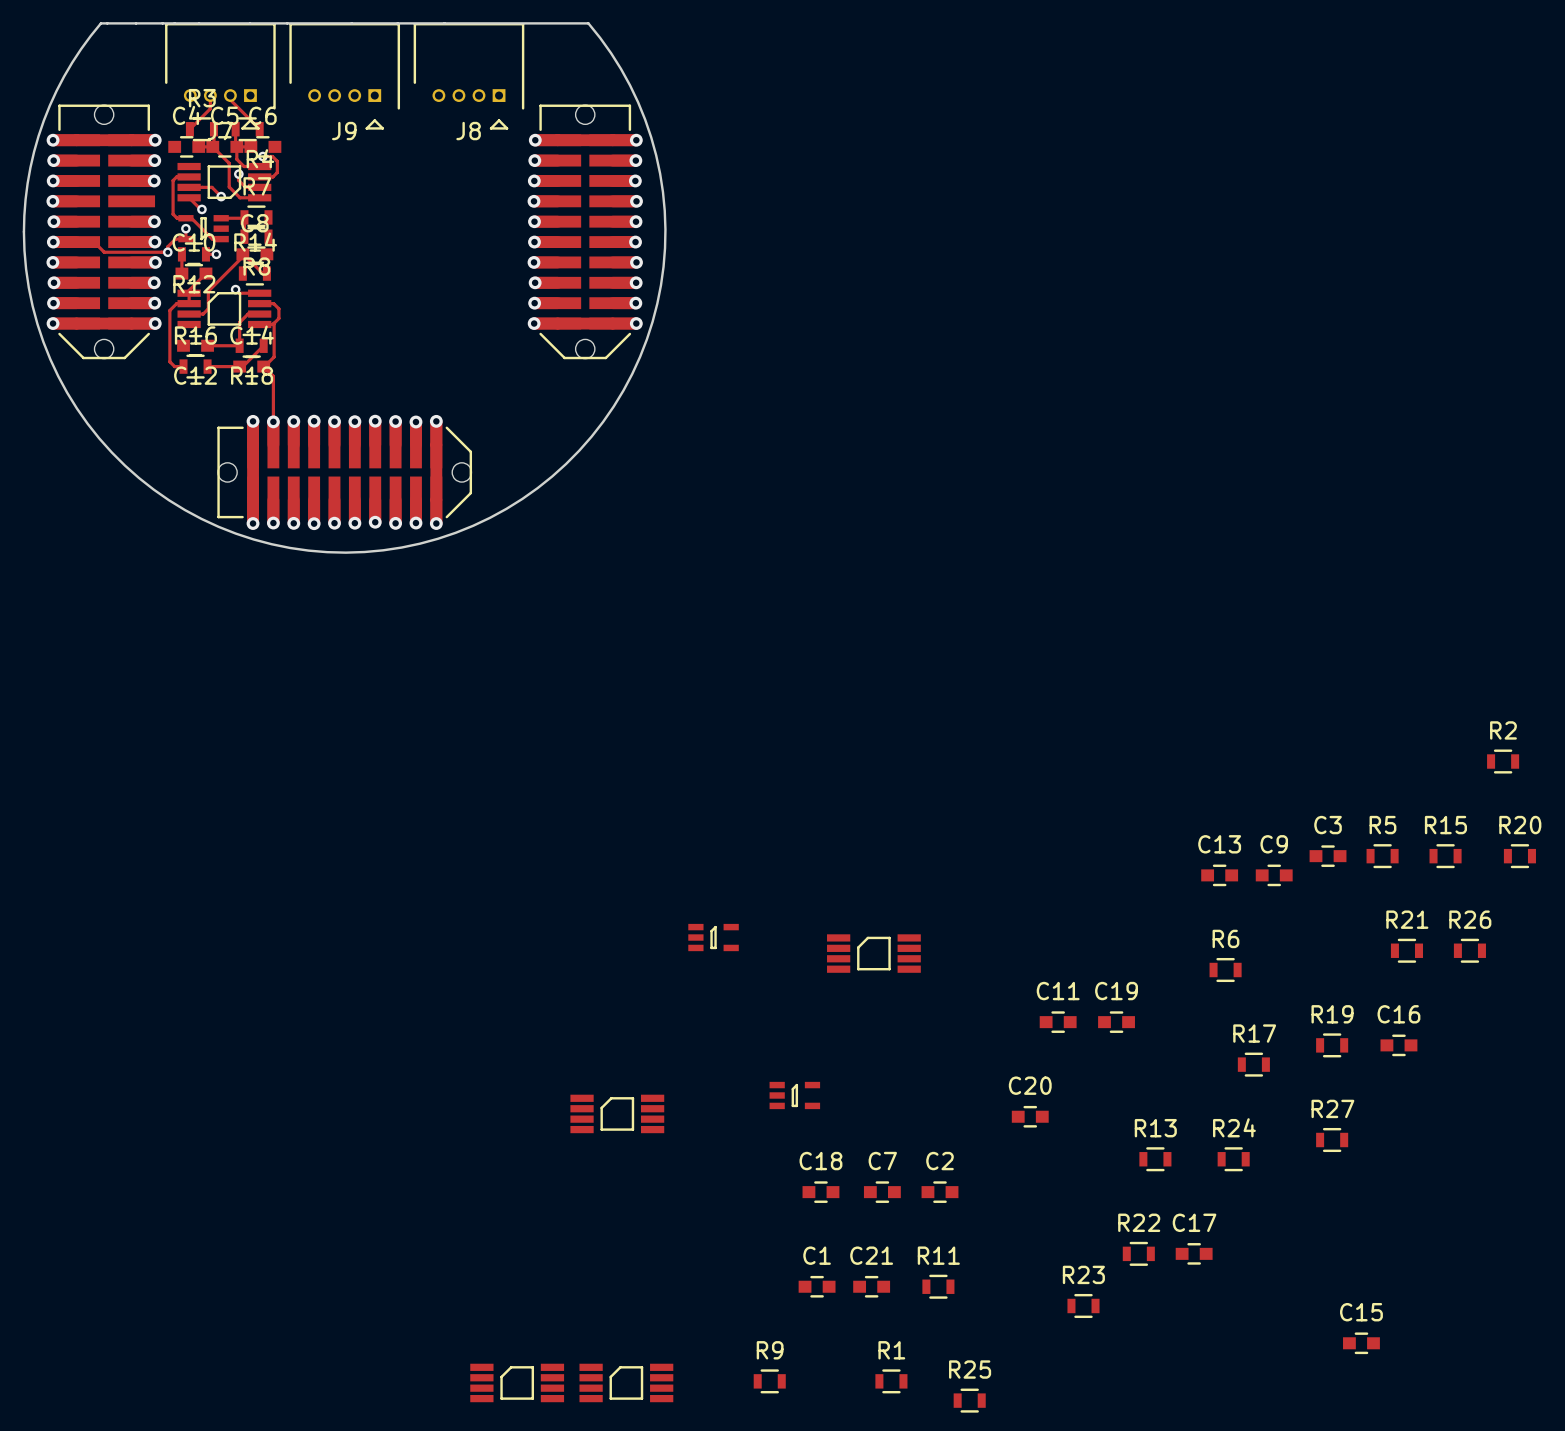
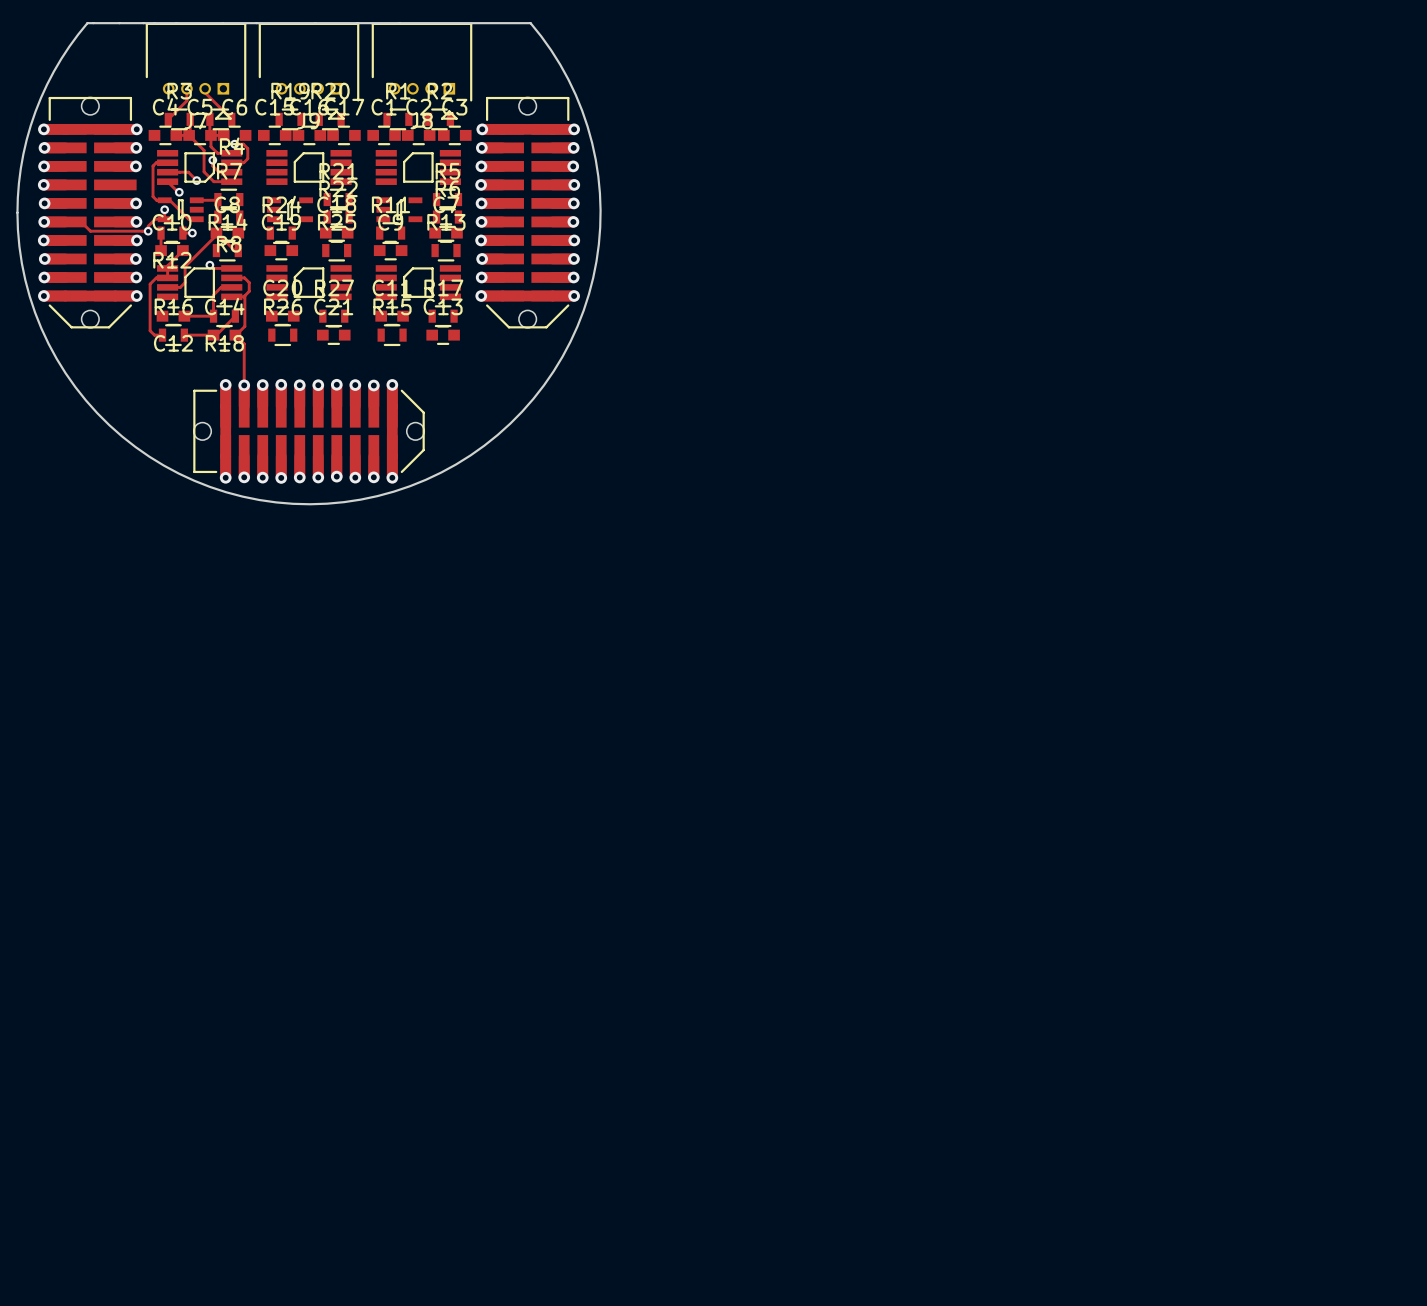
part: none -> (309, 167)
part: none -> (418, 167)
part: none -> (290, 209)
part: none -> (399, 209)
part: none -> (309, 282)
part: none -> (418, 282)
R2 position: (1503, 761) -> (439, 119)
C3 position: (1328, 856) -> (454, 135)
R5 position: (1382, 856) -> (447, 199)
R15 position: (1445, 856) -> (392, 335)
R20 position: (1519, 856) -> (330, 119)
C13 position: (1219, 875) -> (443, 335)
C9 position: (1274, 875) -> (390, 250)
part: (713, 937) -> none
R21 position: (1406, 950) -> (338, 199)
R26 position: (1469, 950) -> (282, 335)
part: (873, 953) -> none
R6 position: (1225, 970) -> (447, 217)
C11 position: (1058, 1022) -> (392, 316)
C19 position: (1116, 1022) -> (281, 250)
R19 position: (1332, 1045) -> (290, 119)
C16 position: (1398, 1045) -> (309, 135)
R17 position: (1253, 1064) -> (443, 316)
part: (794, 1095) -> none
part: (617, 1113) -> none
C20 position: (1030, 1116) -> (282, 316)
R27 position: (1332, 1140) -> (333, 316)
R13 position: (1155, 1159) -> (446, 250)
R24 position: (1233, 1159) -> (281, 233)
C18 position: (820, 1192) -> (336, 233)
C7 position: (882, 1192) -> (446, 233)
C2 position: (939, 1192) -> (418, 135)
R22 position: (1138, 1253) -> (338, 217)
C17 position: (1194, 1253) -> (344, 135)
C1 position: (817, 1286) -> (384, 135)
C21 position: (871, 1286) -> (333, 335)
R11 position: (938, 1286) -> (390, 233)
R23: (1083, 1305) -> none
C15 position: (1361, 1343) -> (274, 135)
R9: (769, 1381) -> none
R1 position: (891, 1381) -> (397, 119)
part: (517, 1382) -> none
part: (626, 1382) -> none
R25 position: (969, 1400) -> (336, 250)

